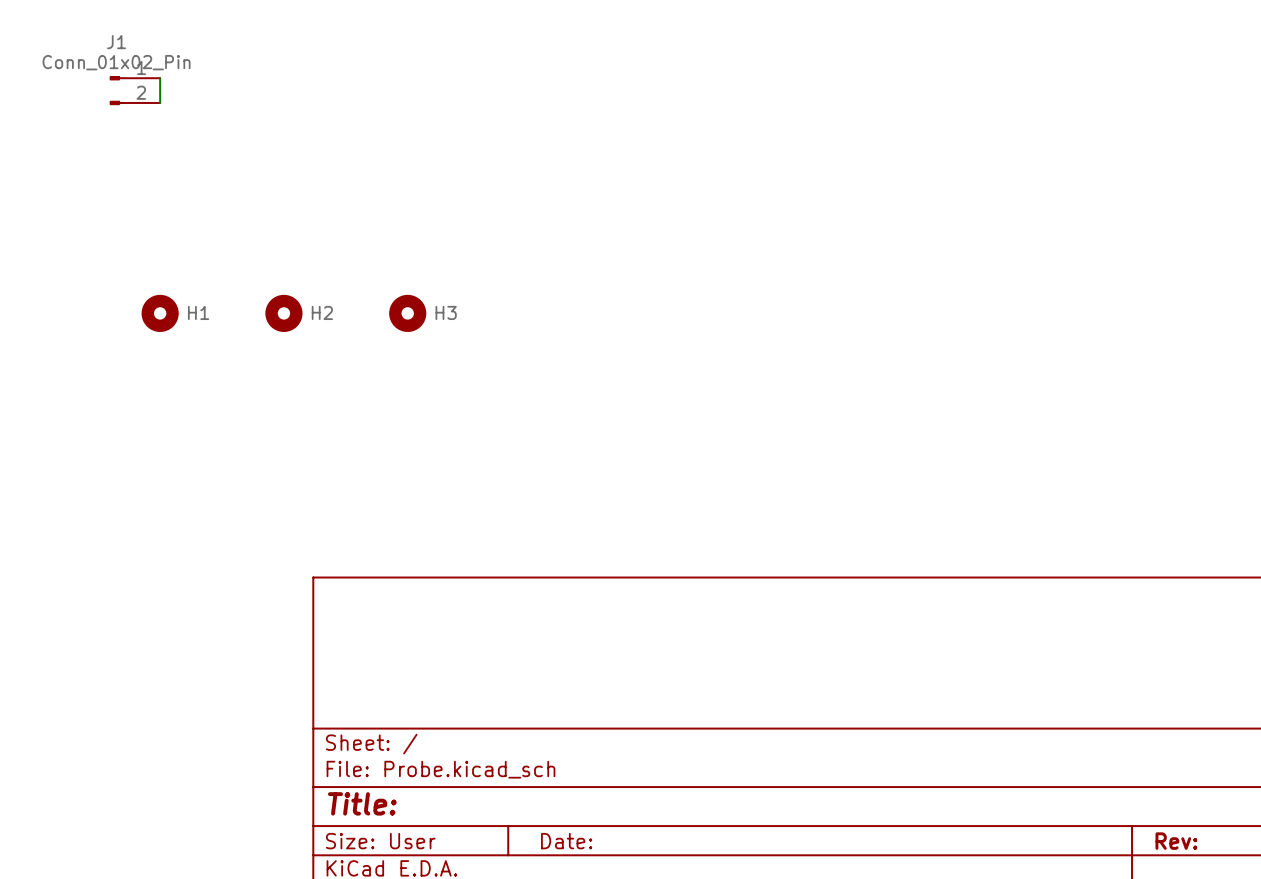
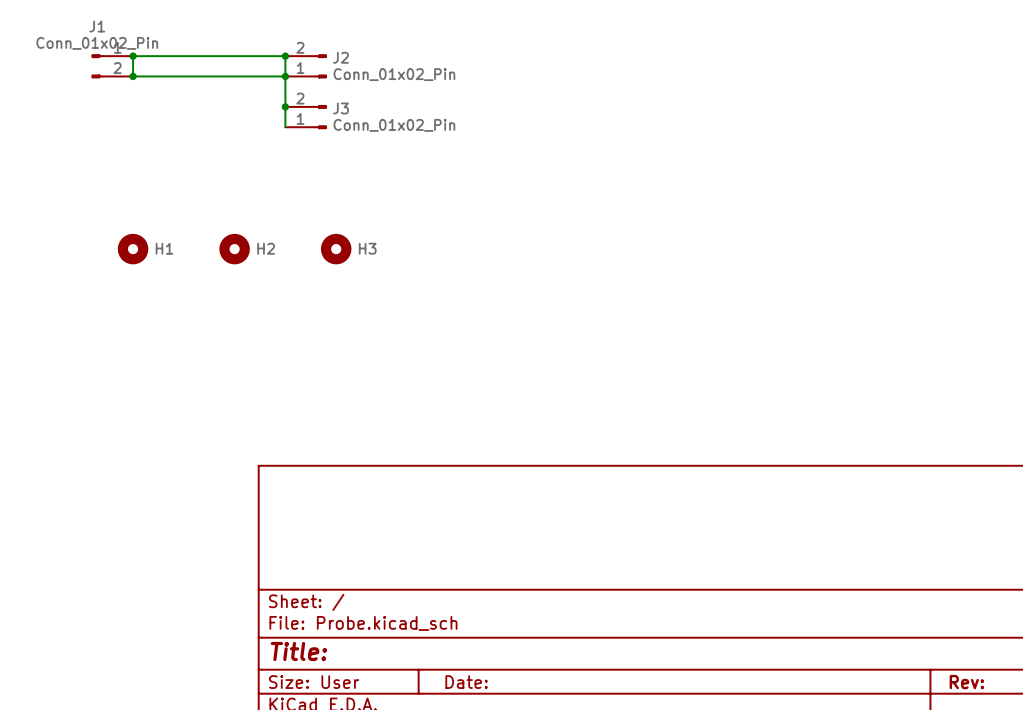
wire: none -> (133, 56) (285, 56) (285, 127)
junction: none -> (133, 56)
junction: none -> (285, 56)
J2: none -> Conn_01x02_Pin (306, 66)
wire: none -> (133, 76) (285, 76)
junction: none -> (133, 76)
junction: none -> (285, 76)
junction: none -> (285, 106)
J3: none -> Conn_01x02_Pin (306, 117)

